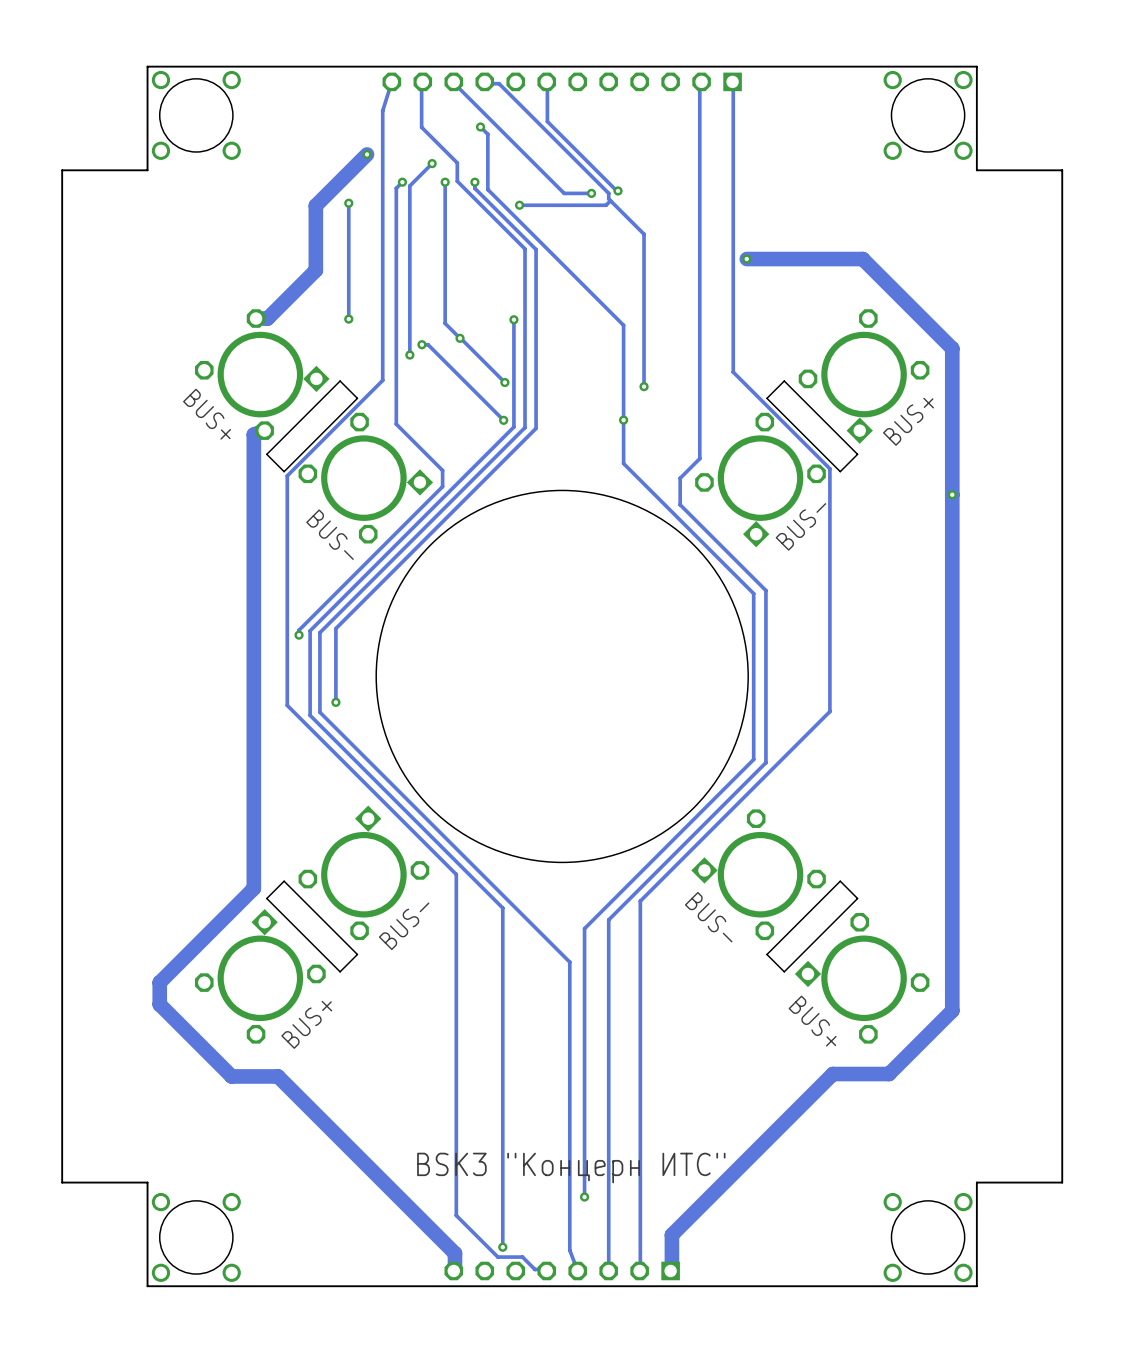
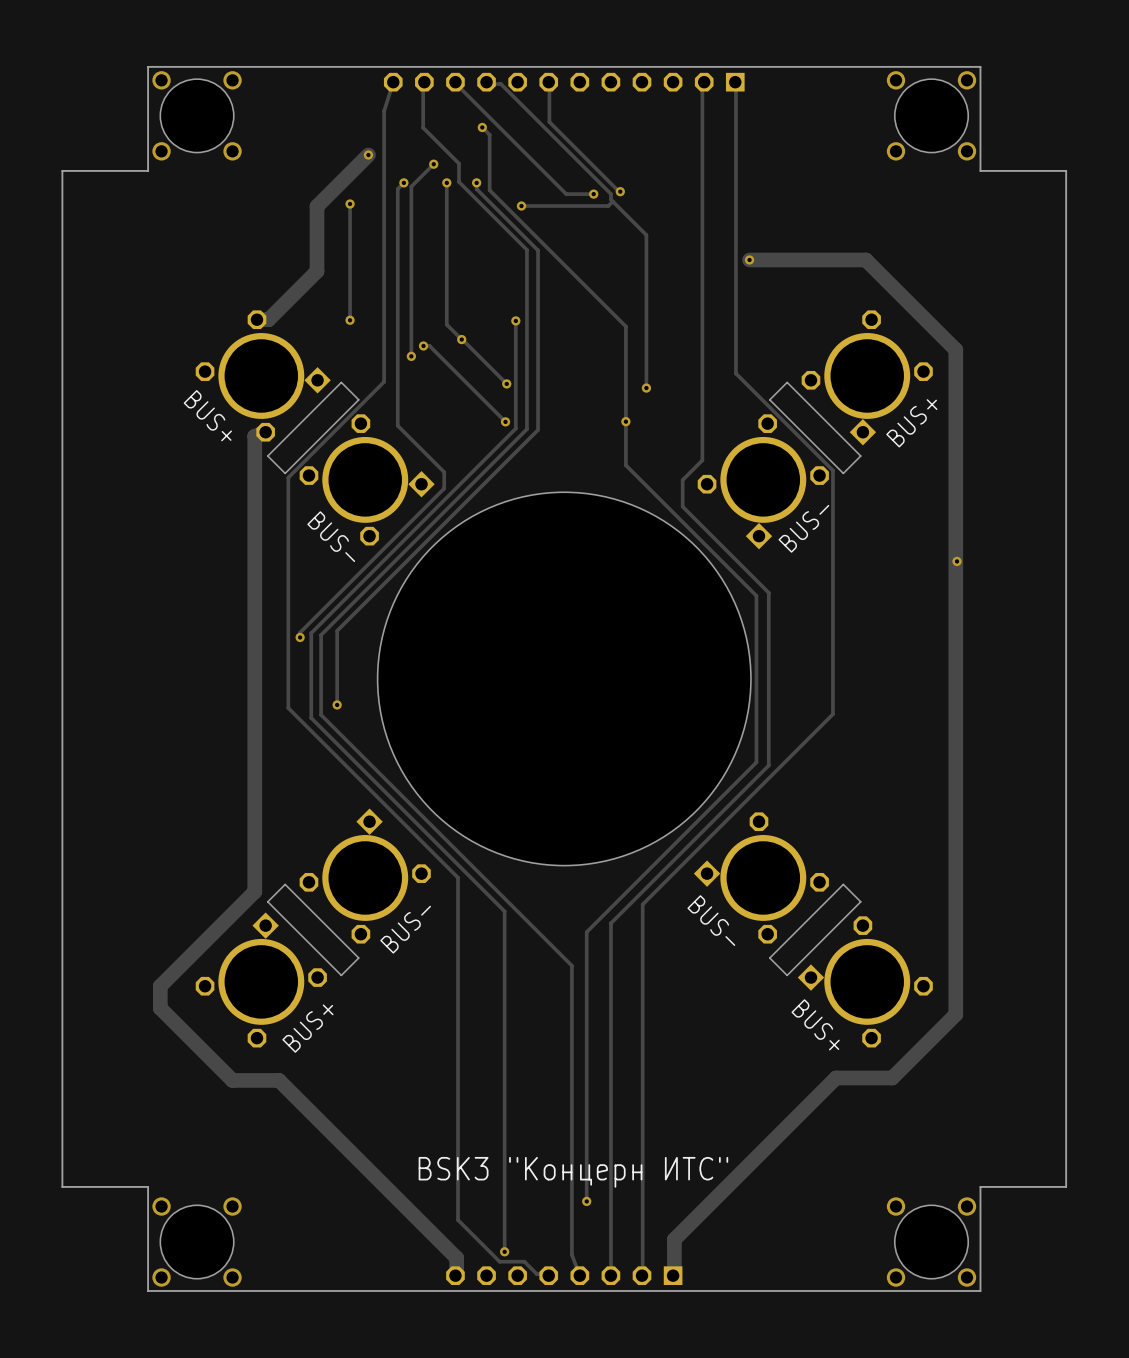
via position: (952, 494) -> (957, 561)

